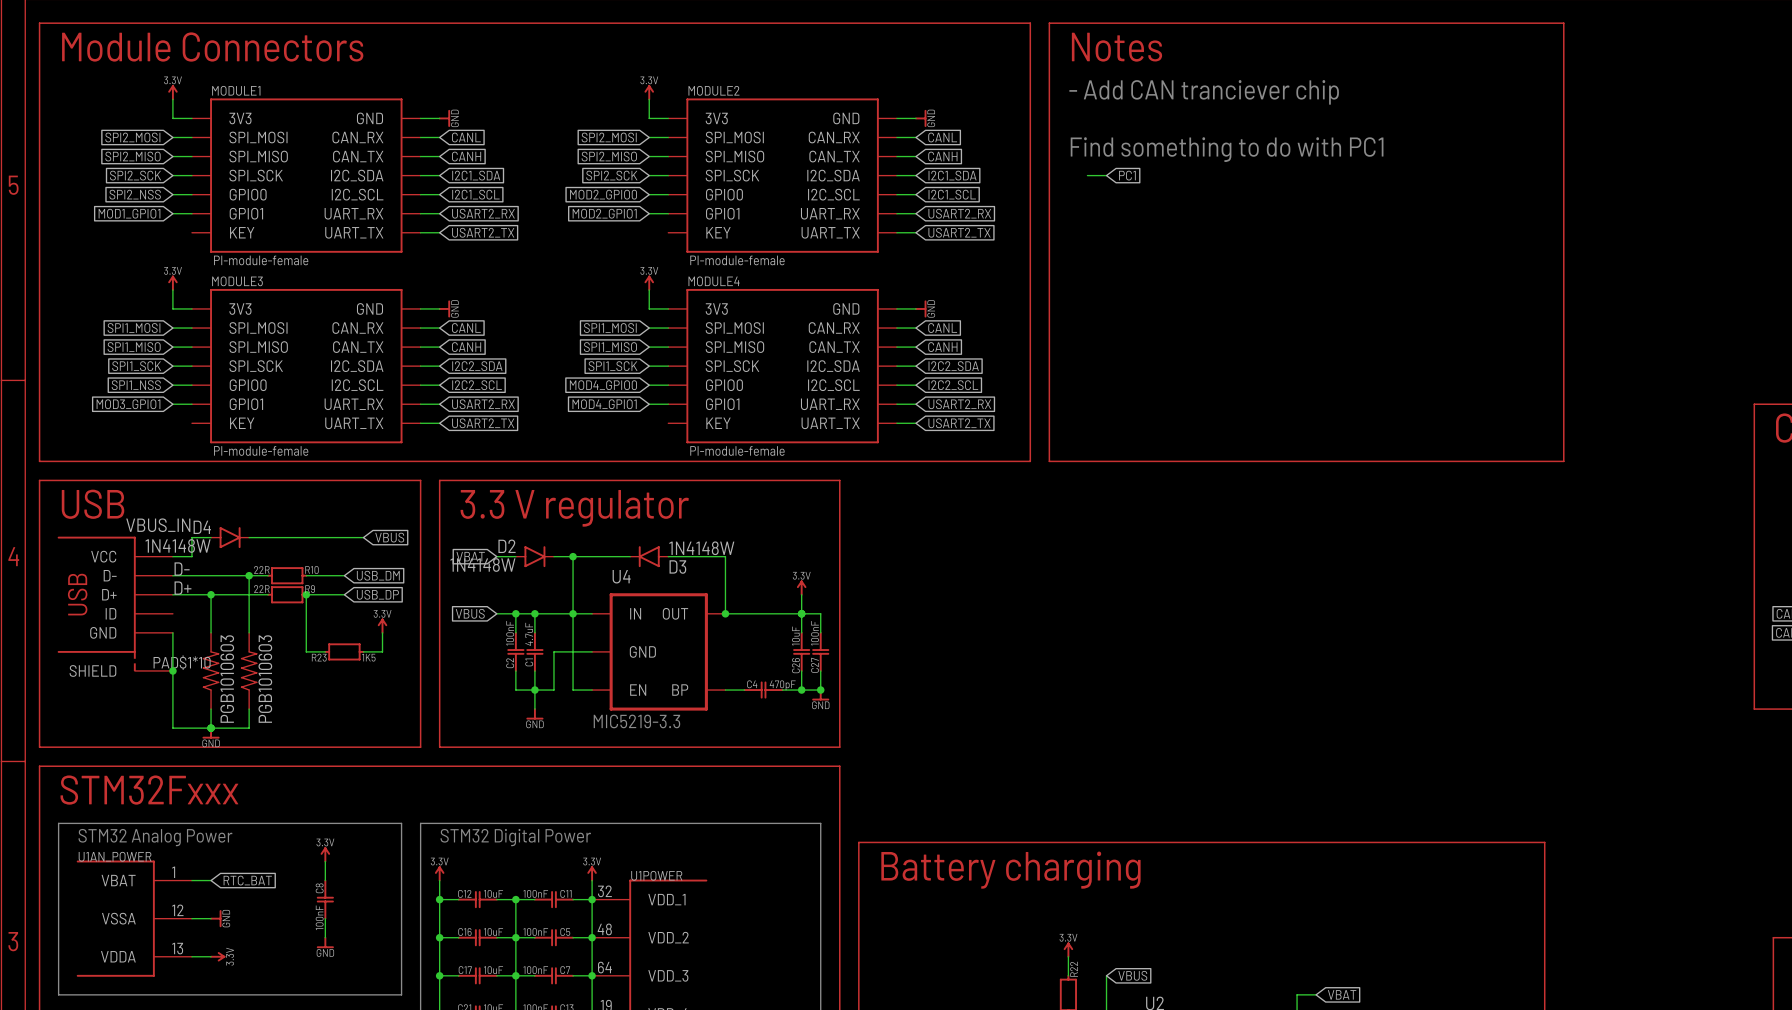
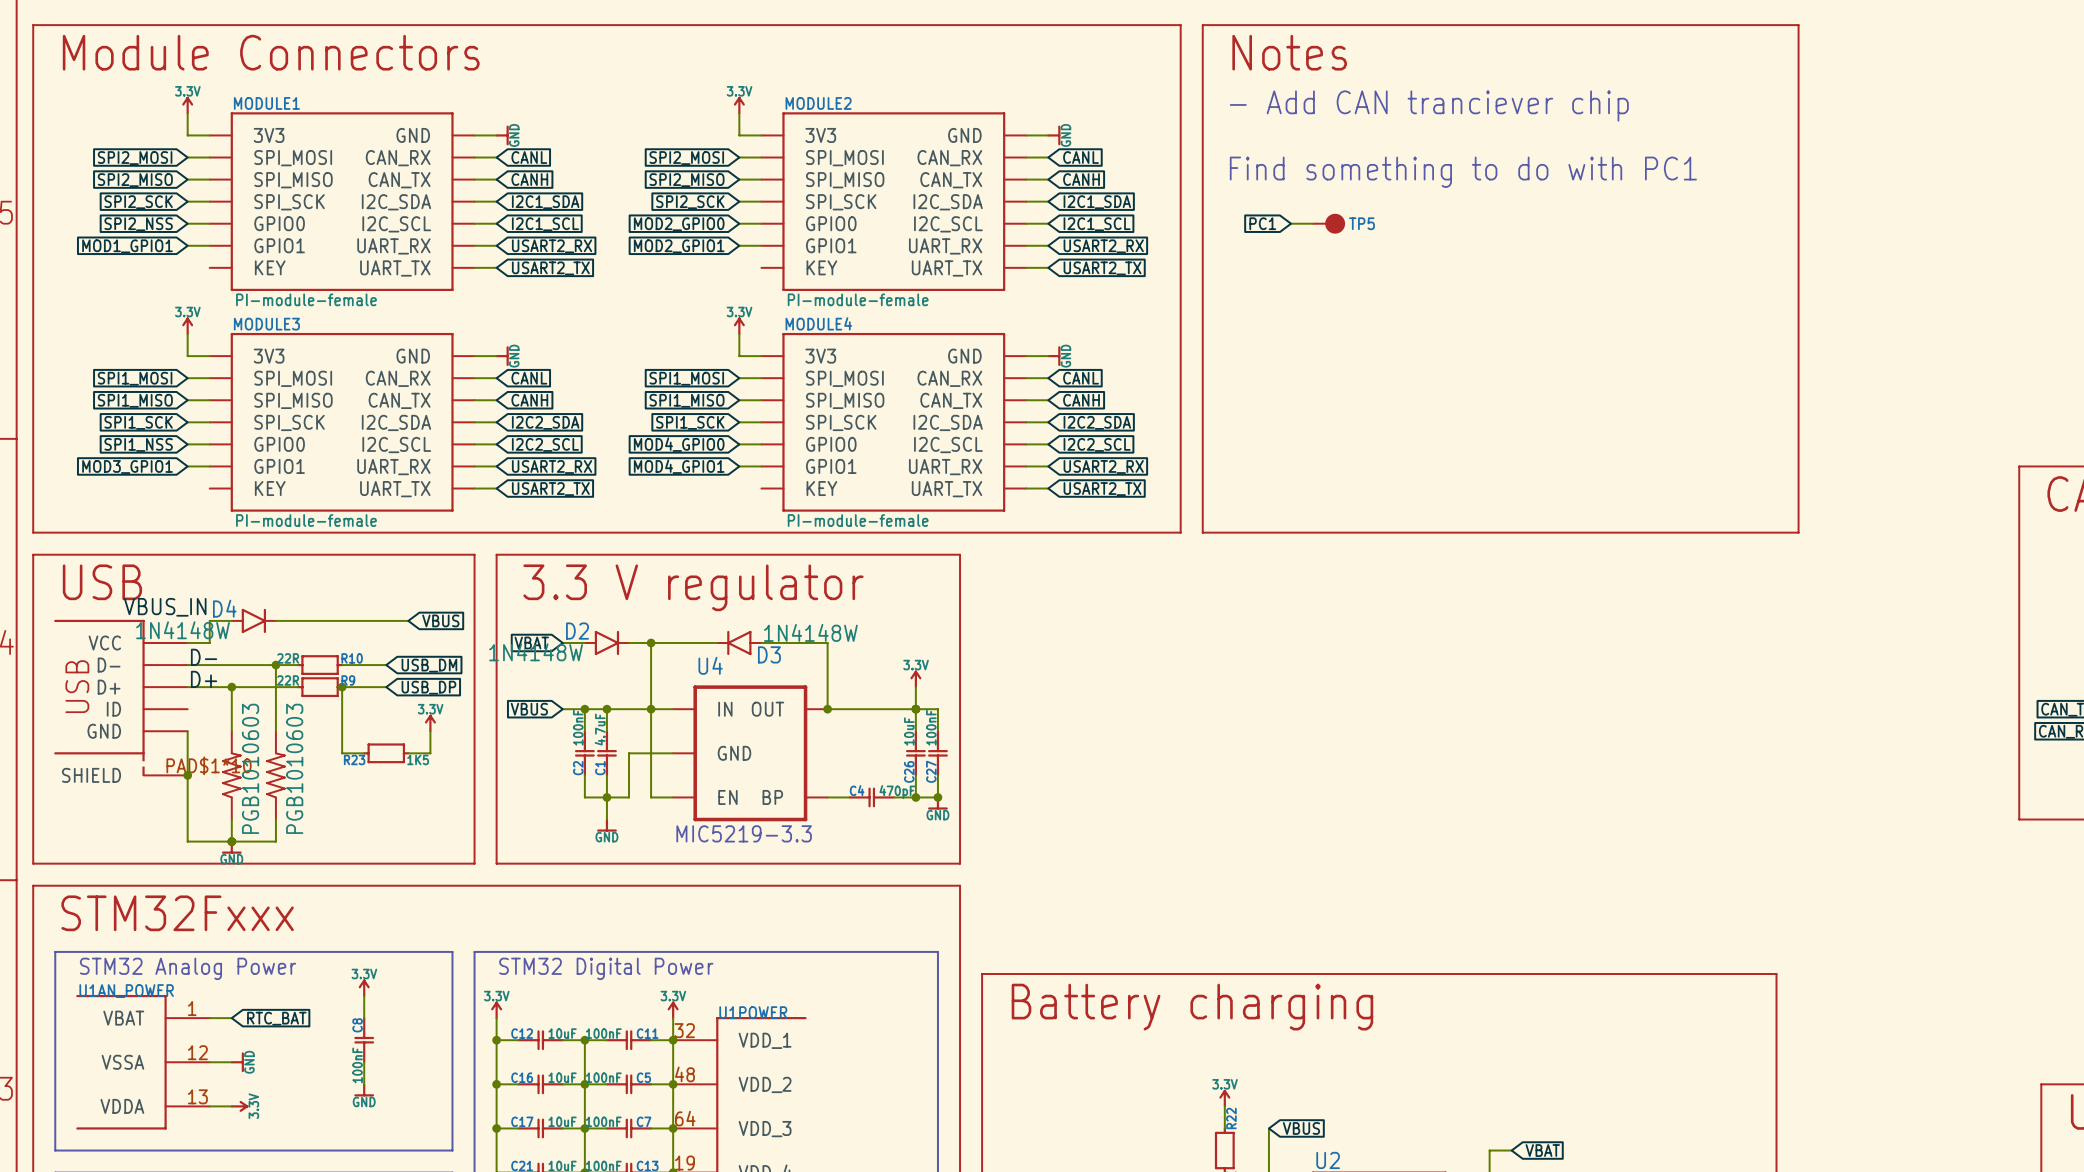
wire: (1087, 175) (1106, 175) -> (1291, 223) (1313, 223)
global label rotation: 0° (1127, 175) -> 180° (1262, 223)
TP5: none -> (1329, 223)

